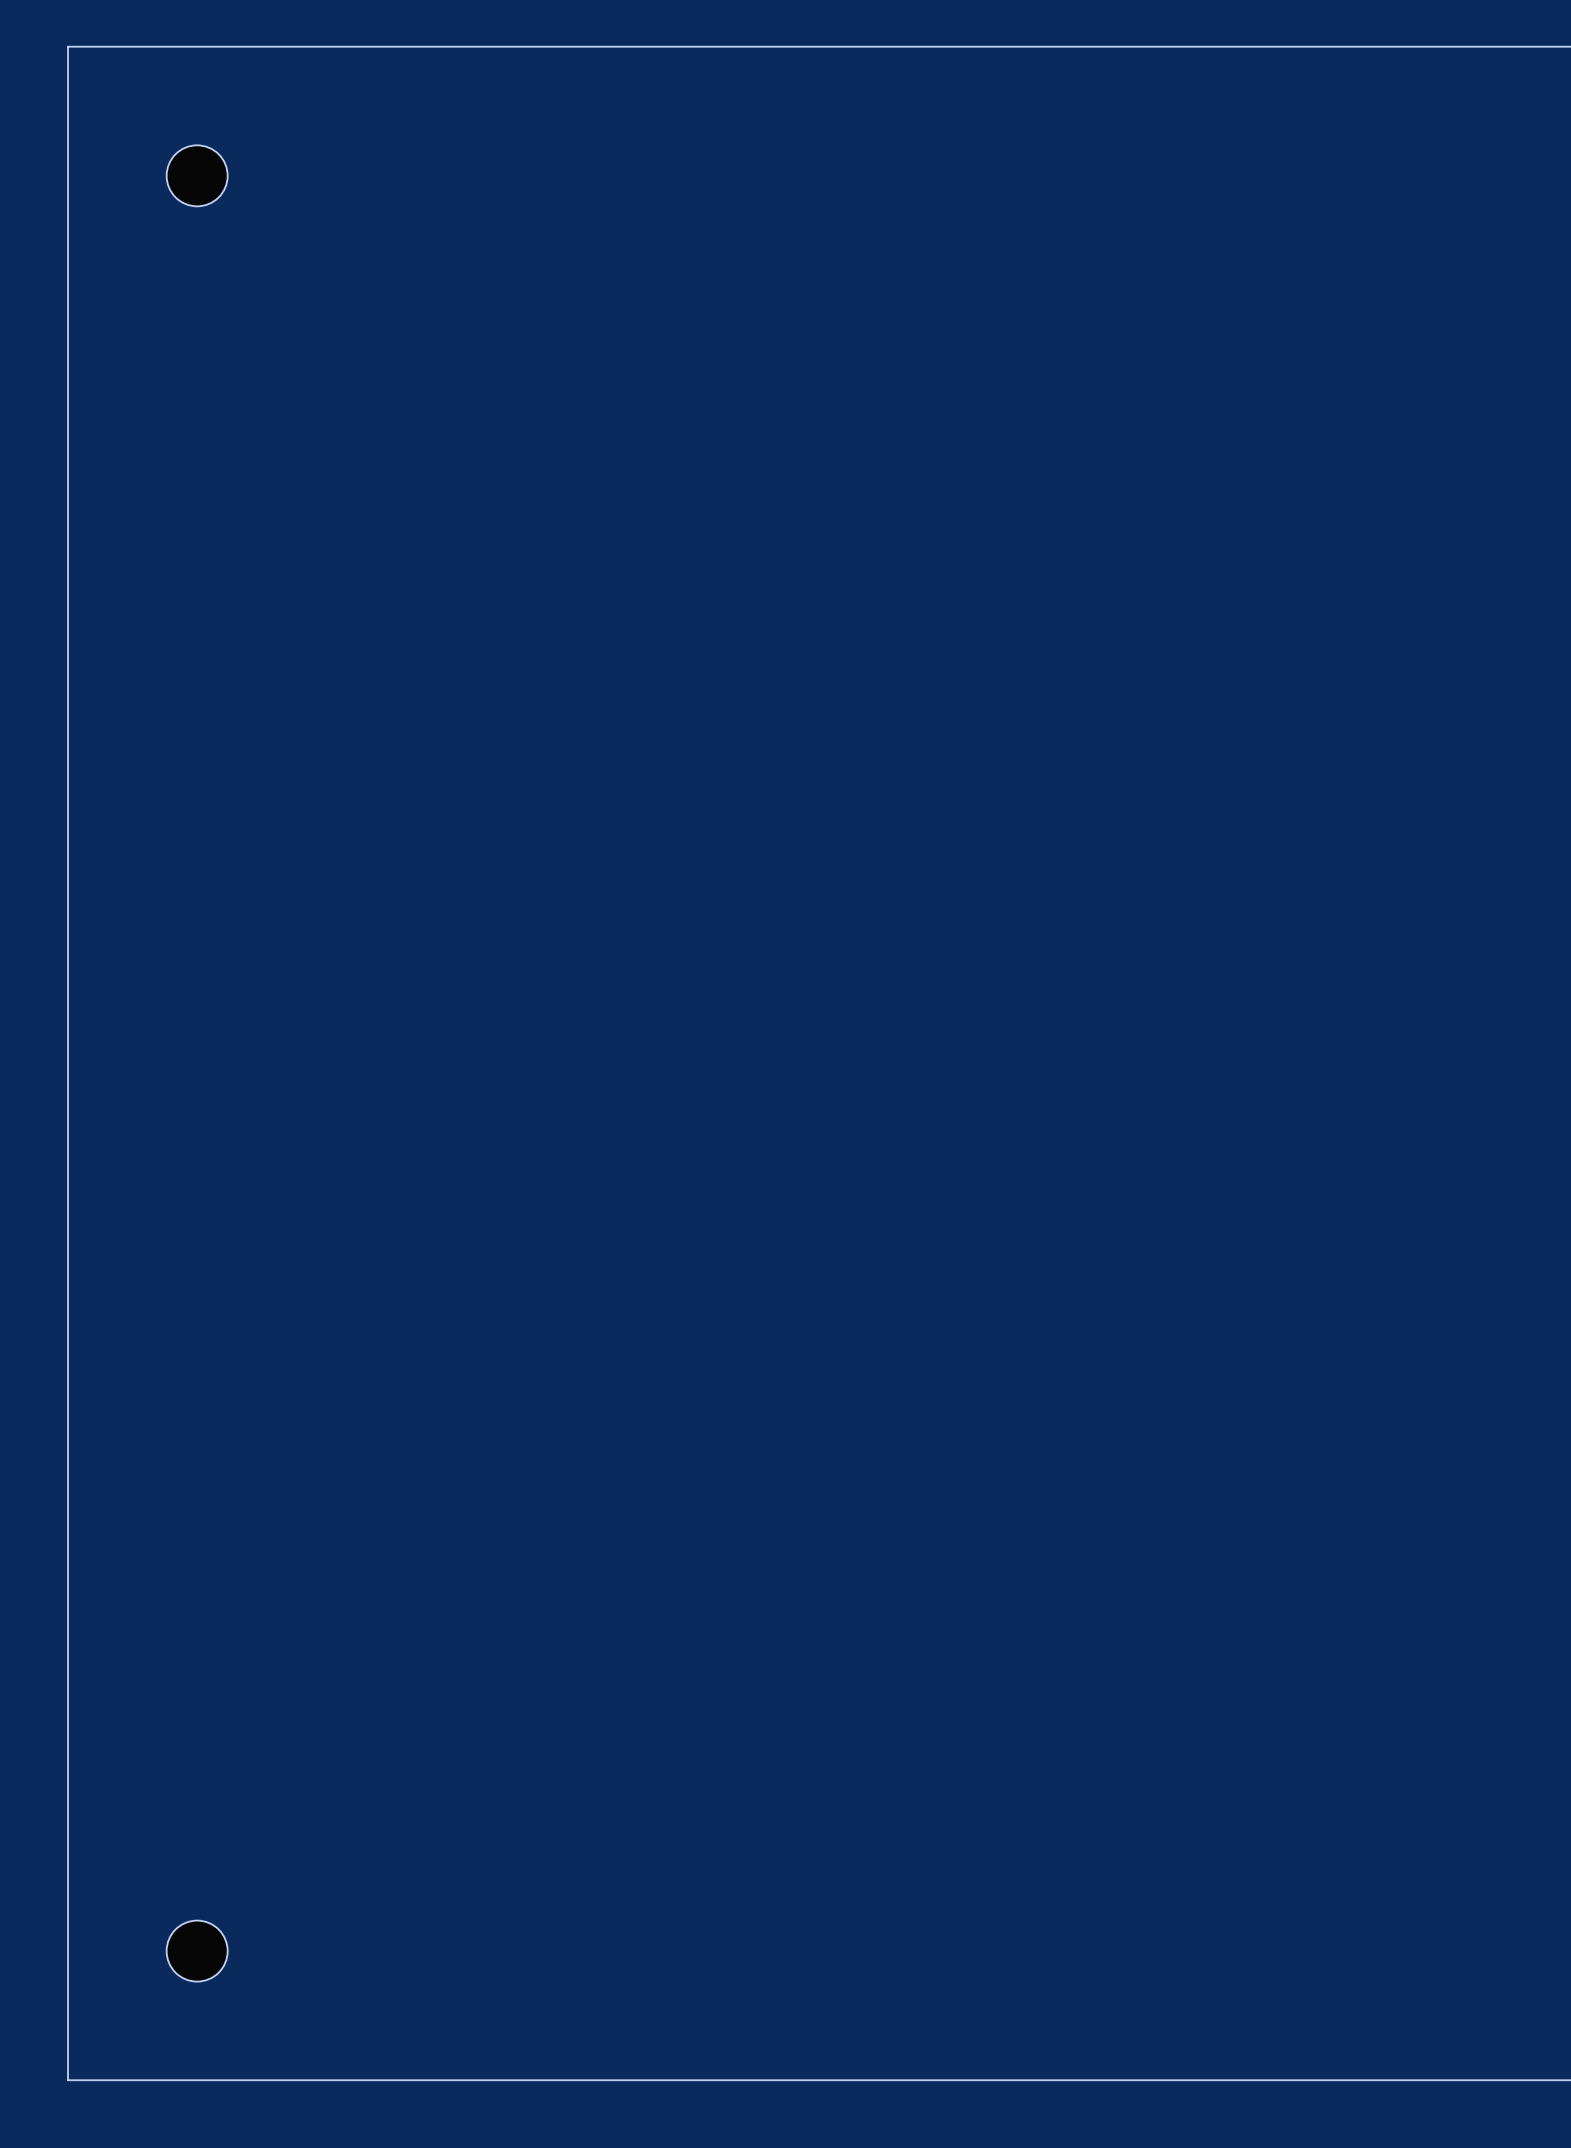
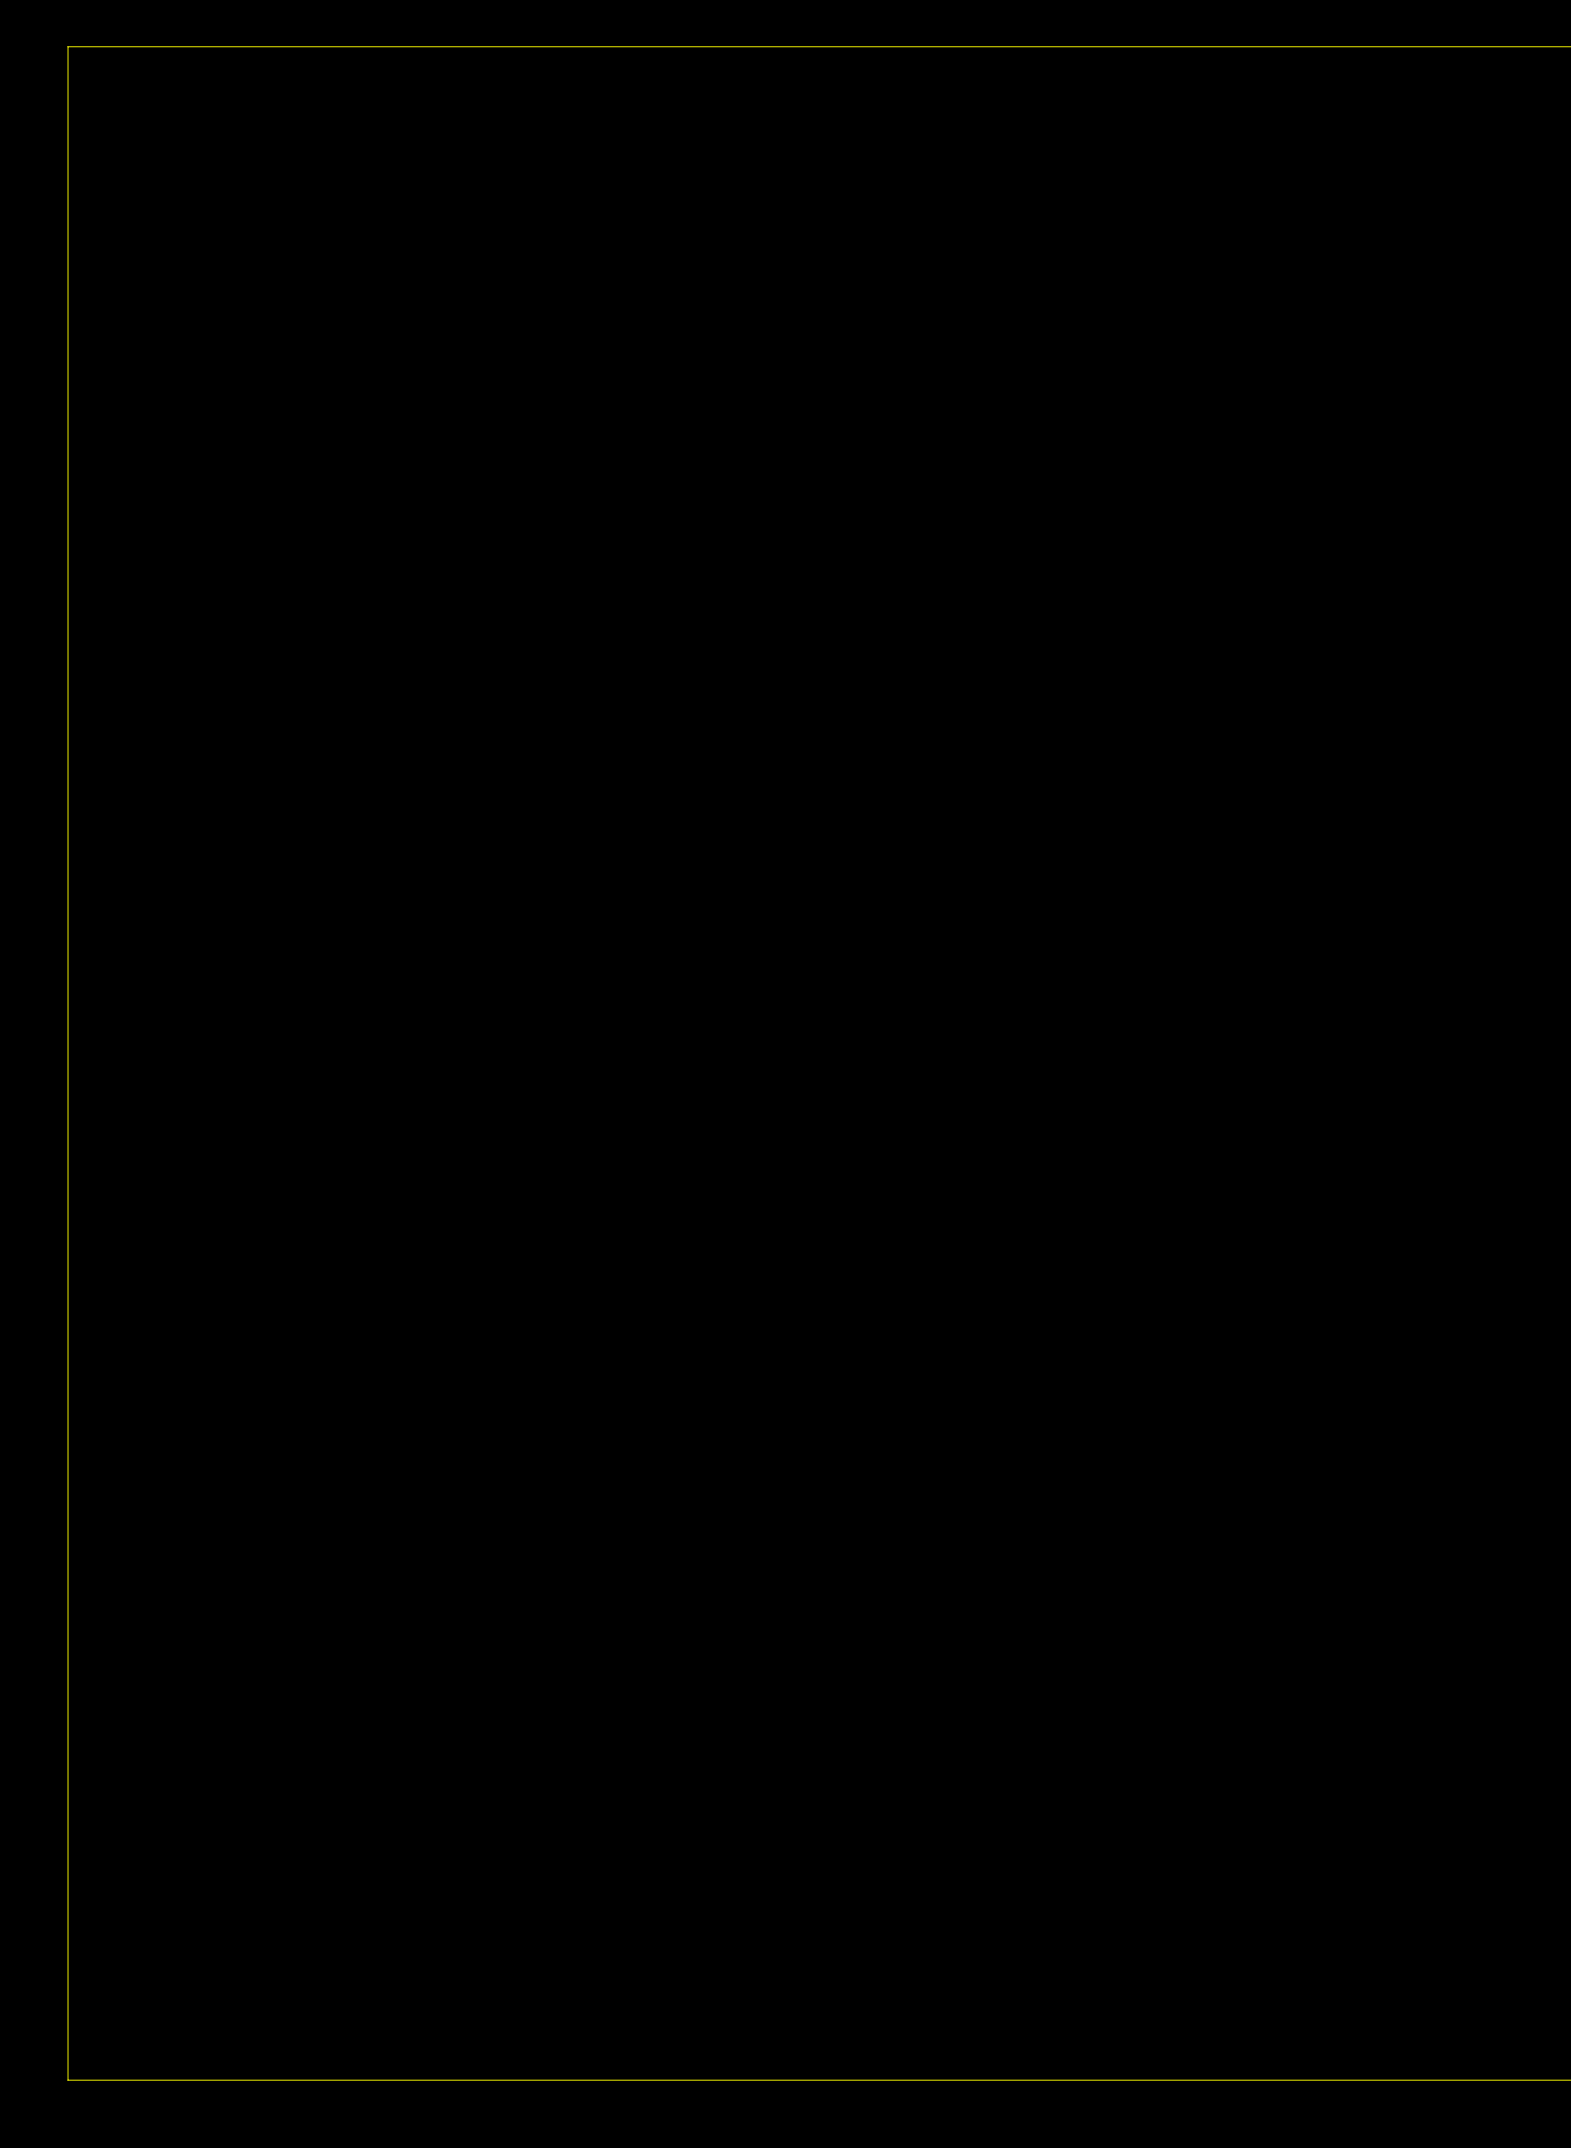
part: (197, 175) -> none
part: (197, 1951) -> none

